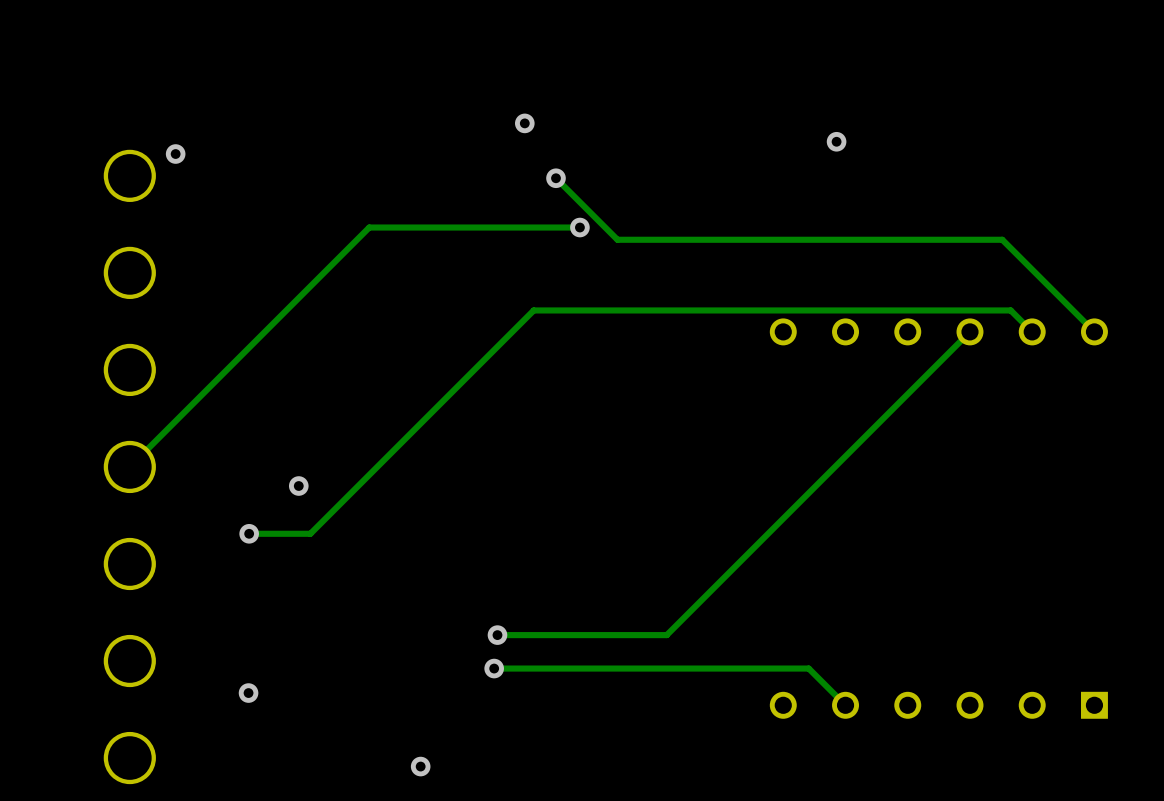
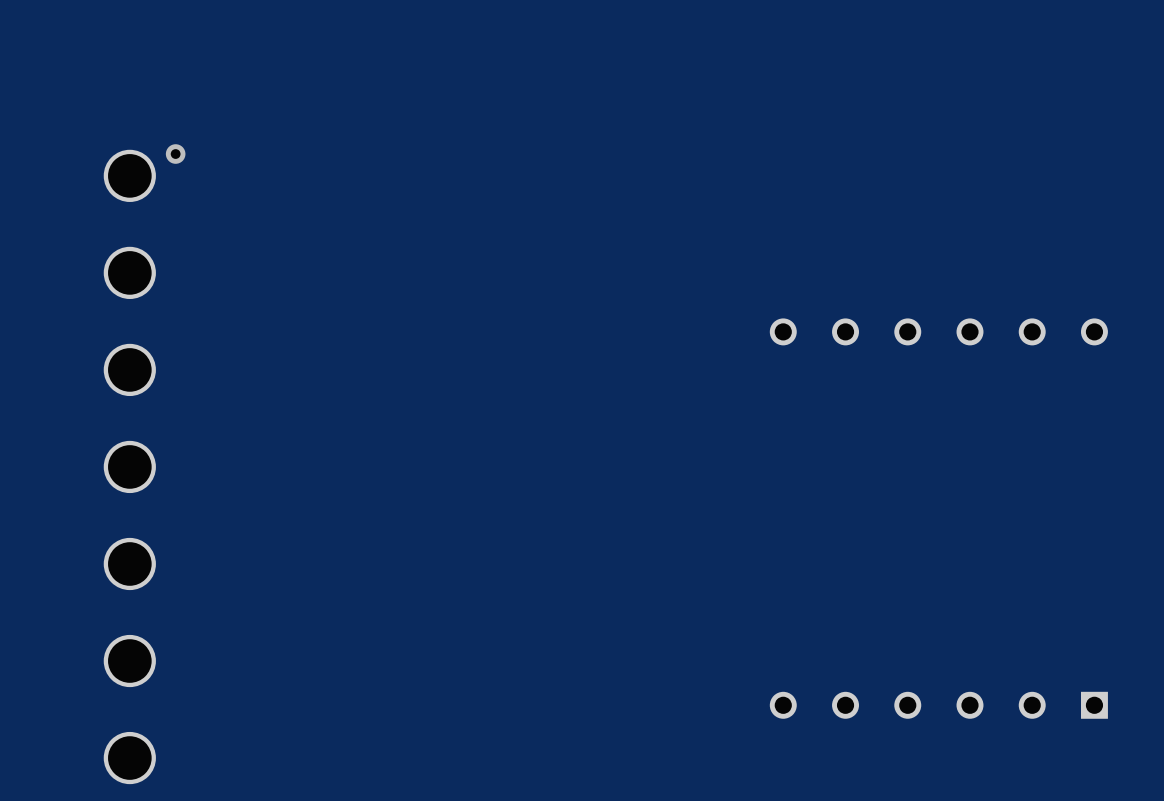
via: (524, 123) -> none
via: (836, 141) -> none
track: (556, 178) (617, 239) (1002, 239) (1094, 331) -> none
via: (556, 178) -> none
track: (579, 227) (369, 227) (129, 466) -> none
via: (579, 227) -> none
track: (969, 331) (666, 635) (497, 635) -> none
track: (1032, 331) (1010, 310) (533, 310) (310, 533) (249, 533) -> none
via: (298, 486) -> none
via: (249, 533) -> none
via: (497, 635) -> none
track: (494, 668) (808, 668) (845, 705) -> none
via: (494, 668) -> none
via: (248, 693) -> none
via: (420, 766) -> none

